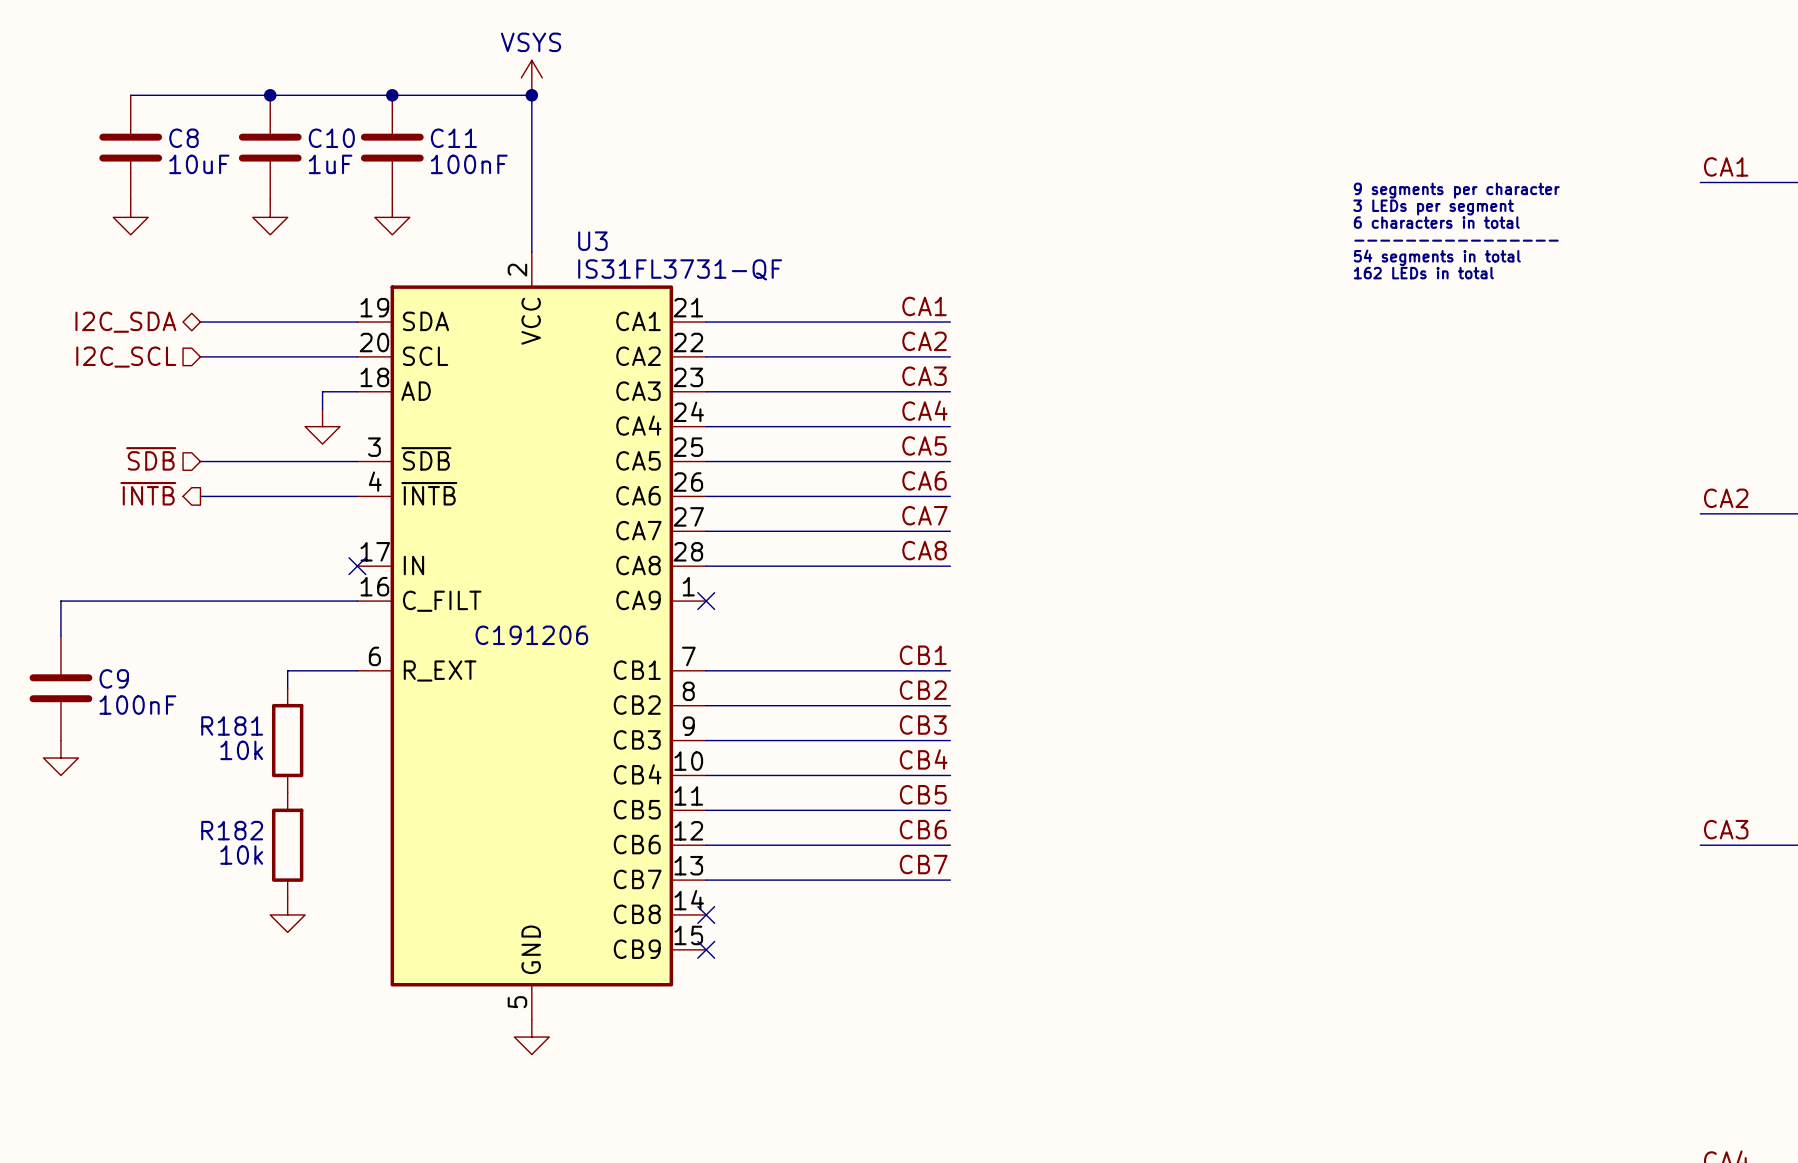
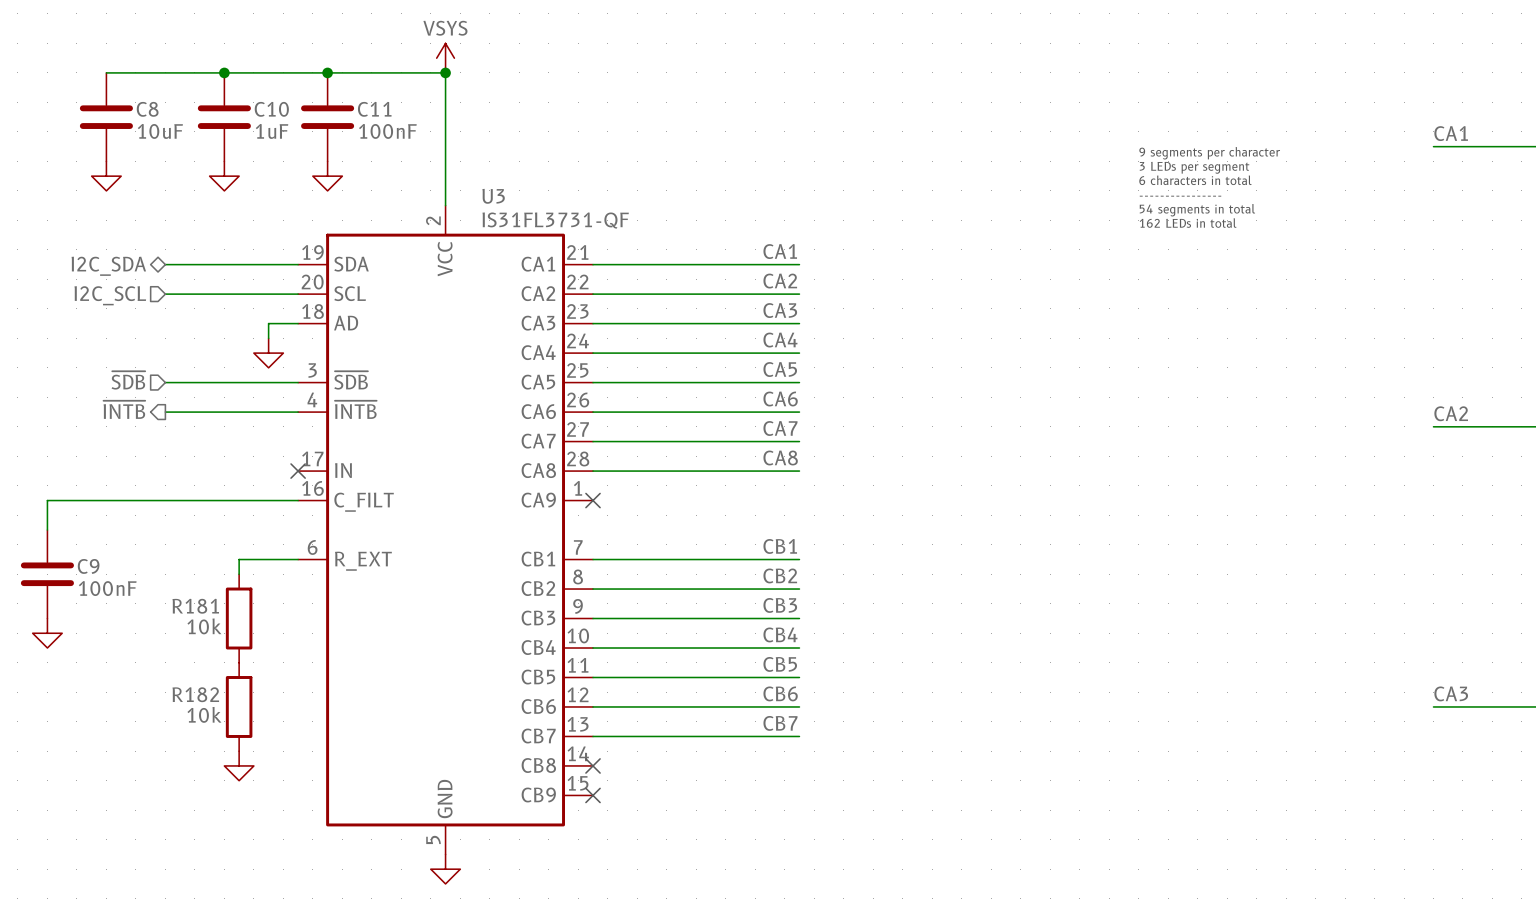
U3 text: C191206 (531, 635) -> none

